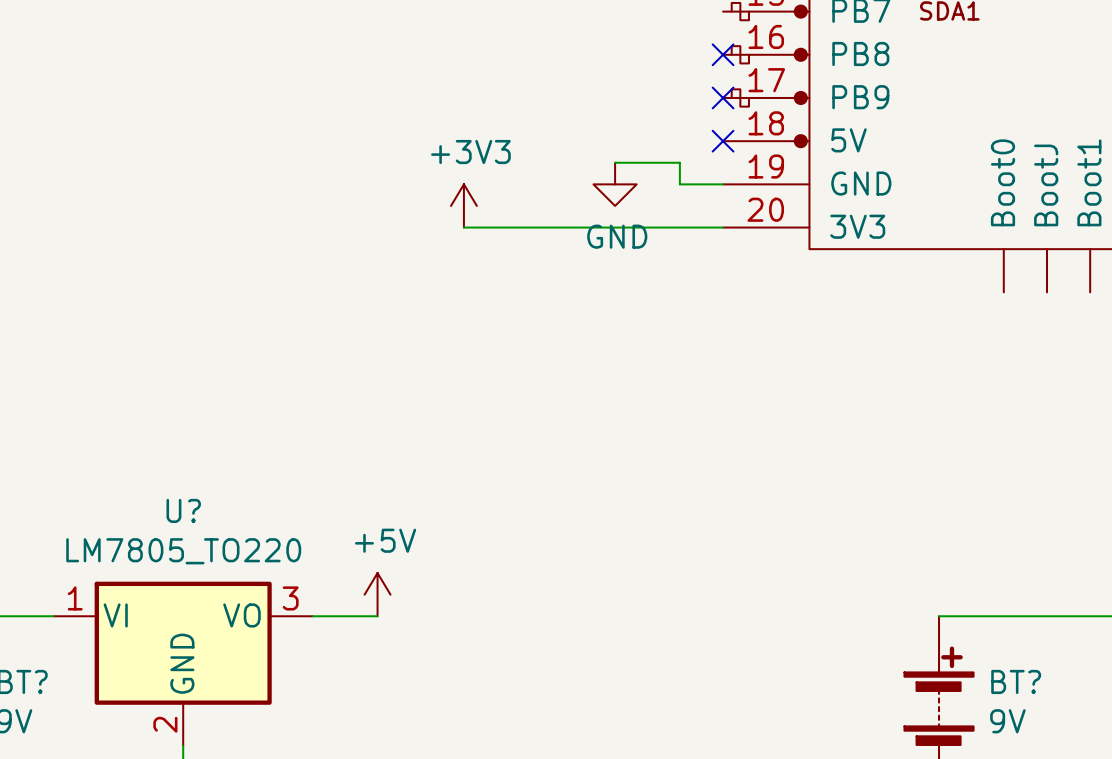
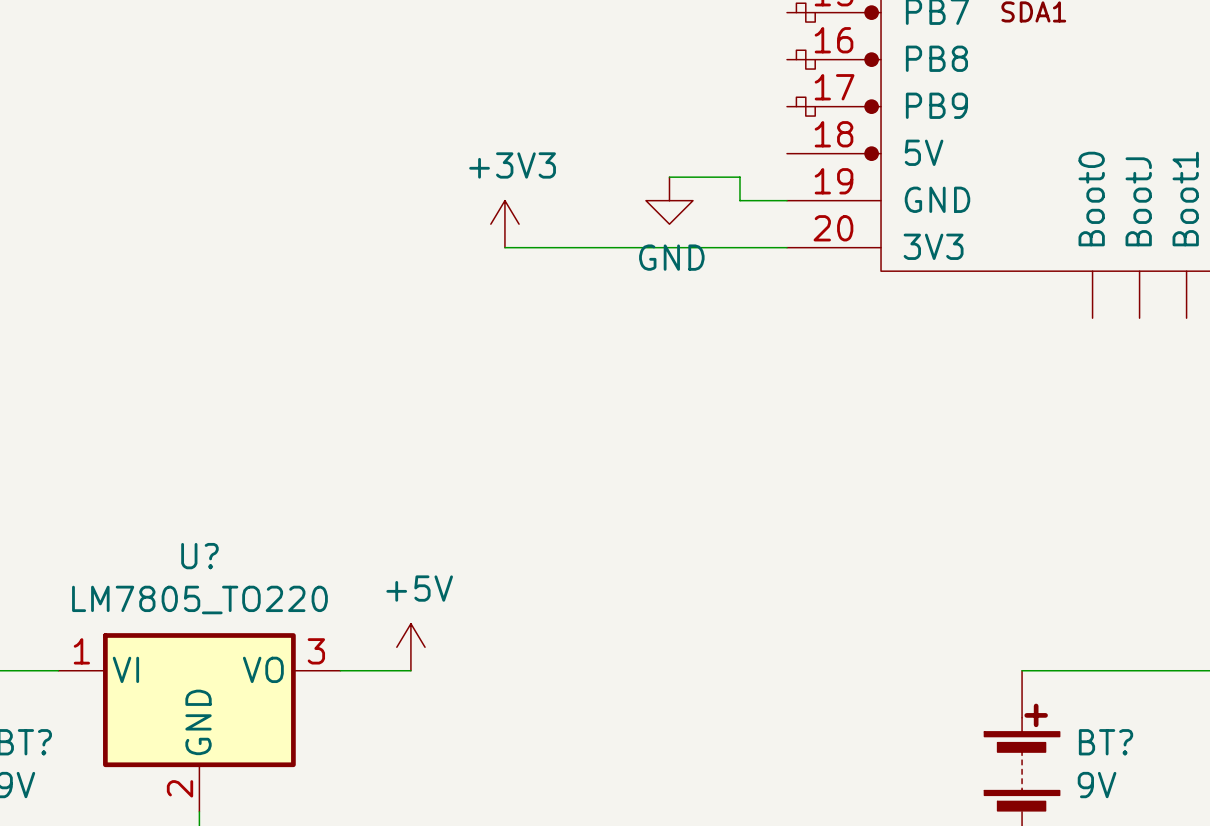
no-connect mark: (723, 54) -> none
no-connect mark: (723, 97) -> none
no-connect mark: (723, 141) -> none

